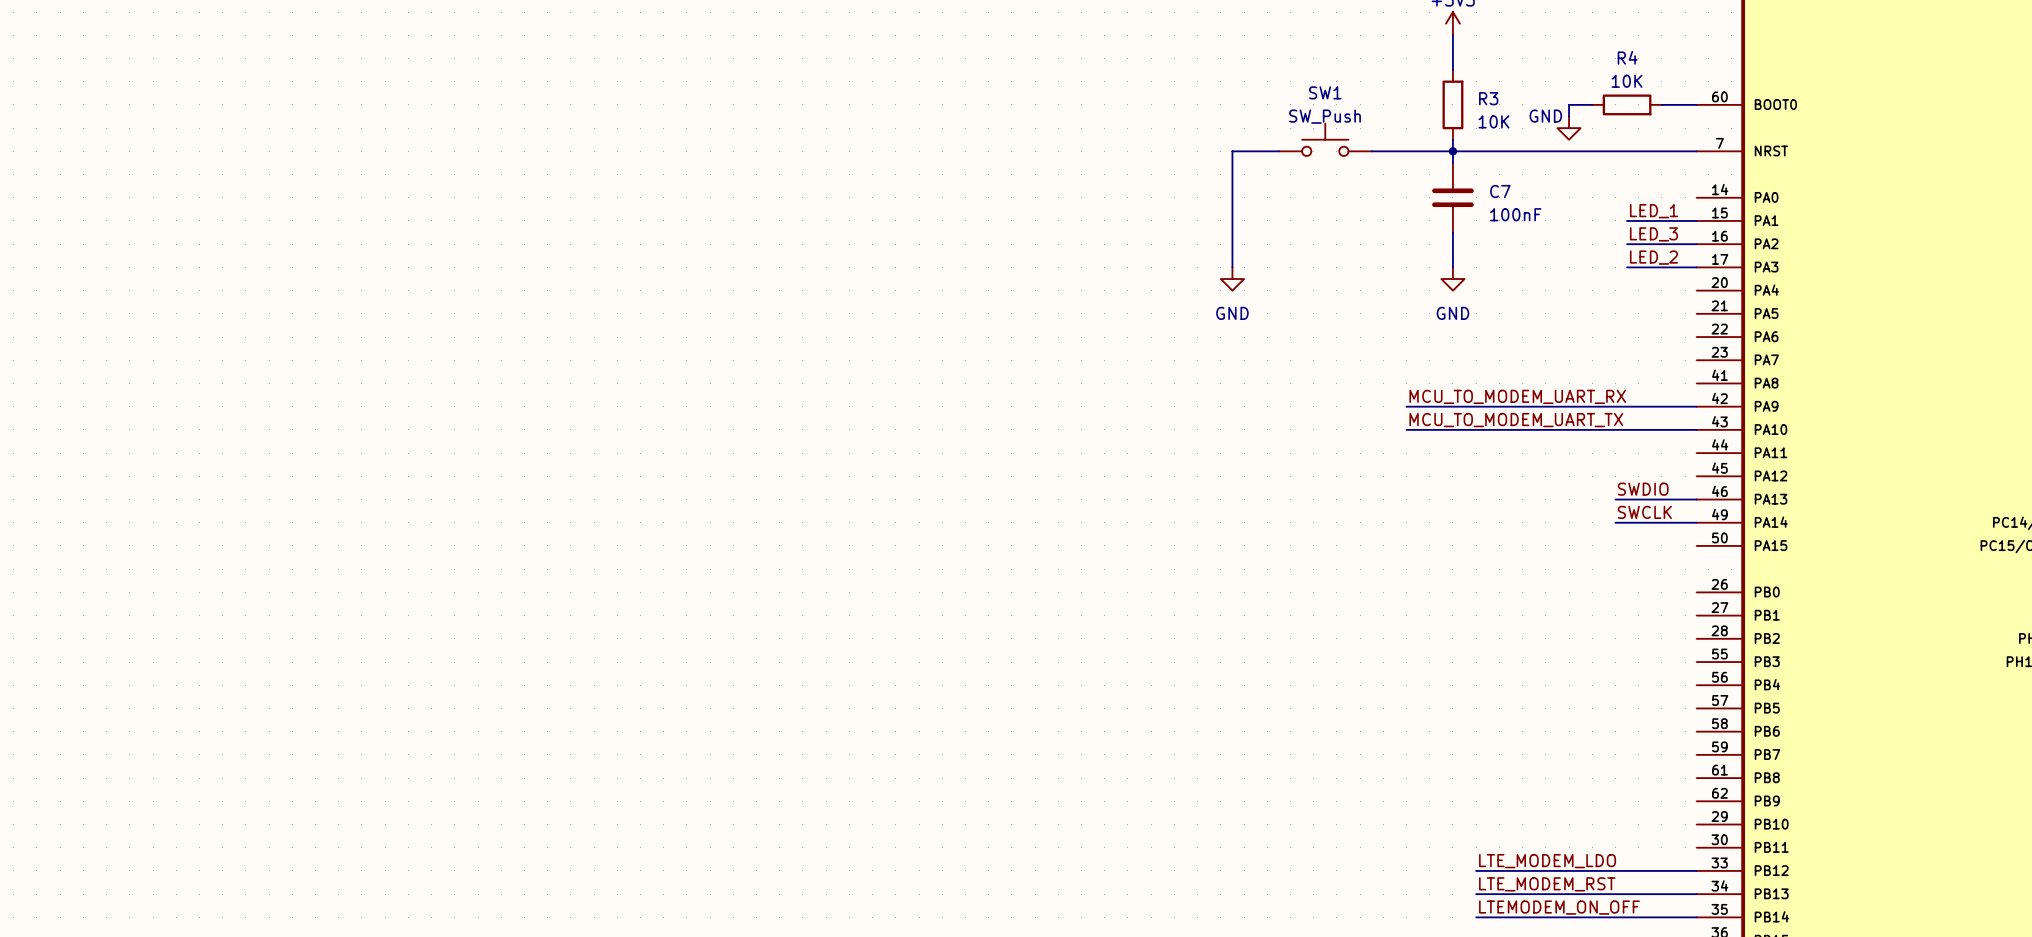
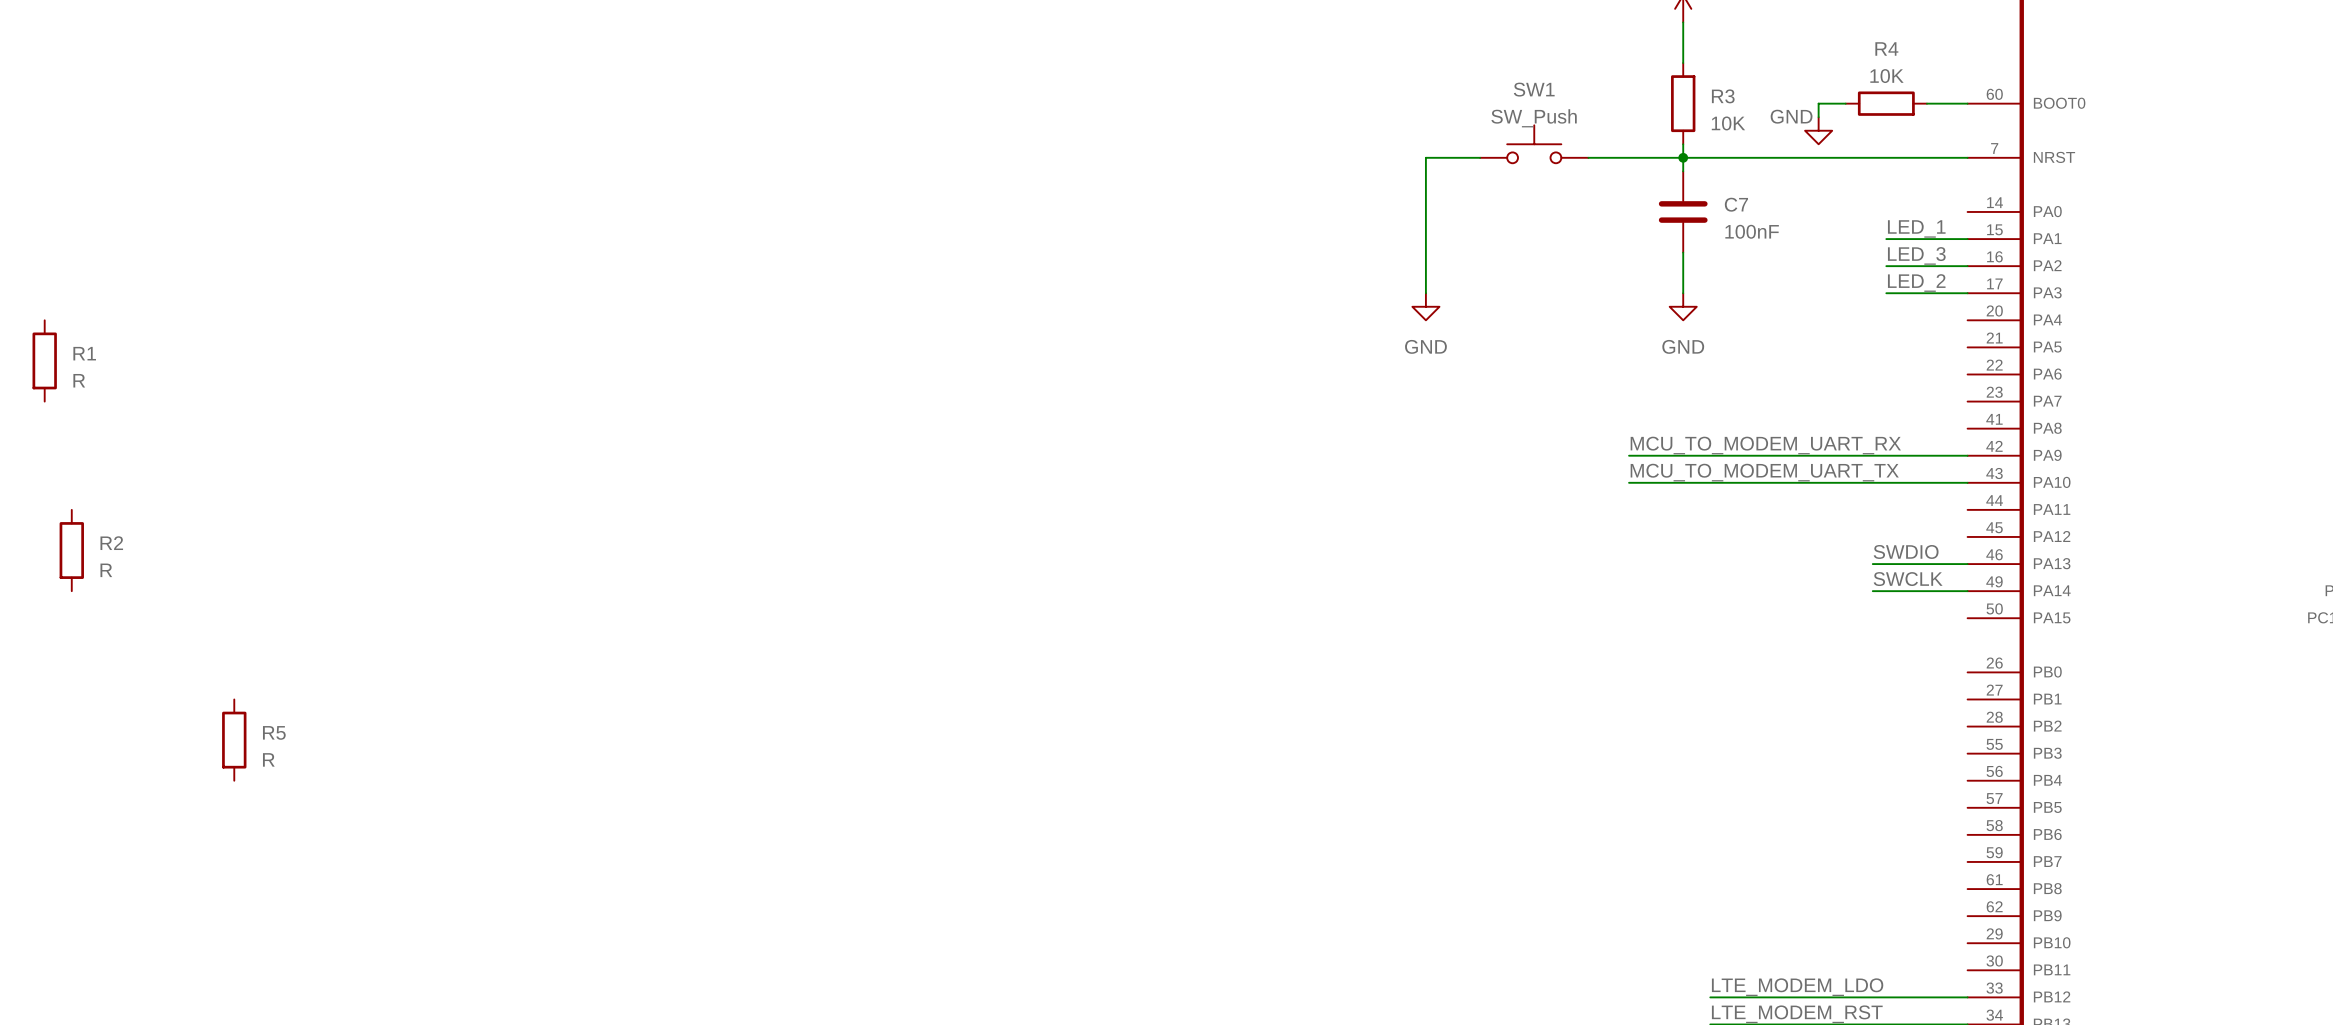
R1: none -> R (44, 360)
R2: none -> R (71, 550)
R5: none -> R (234, 740)

